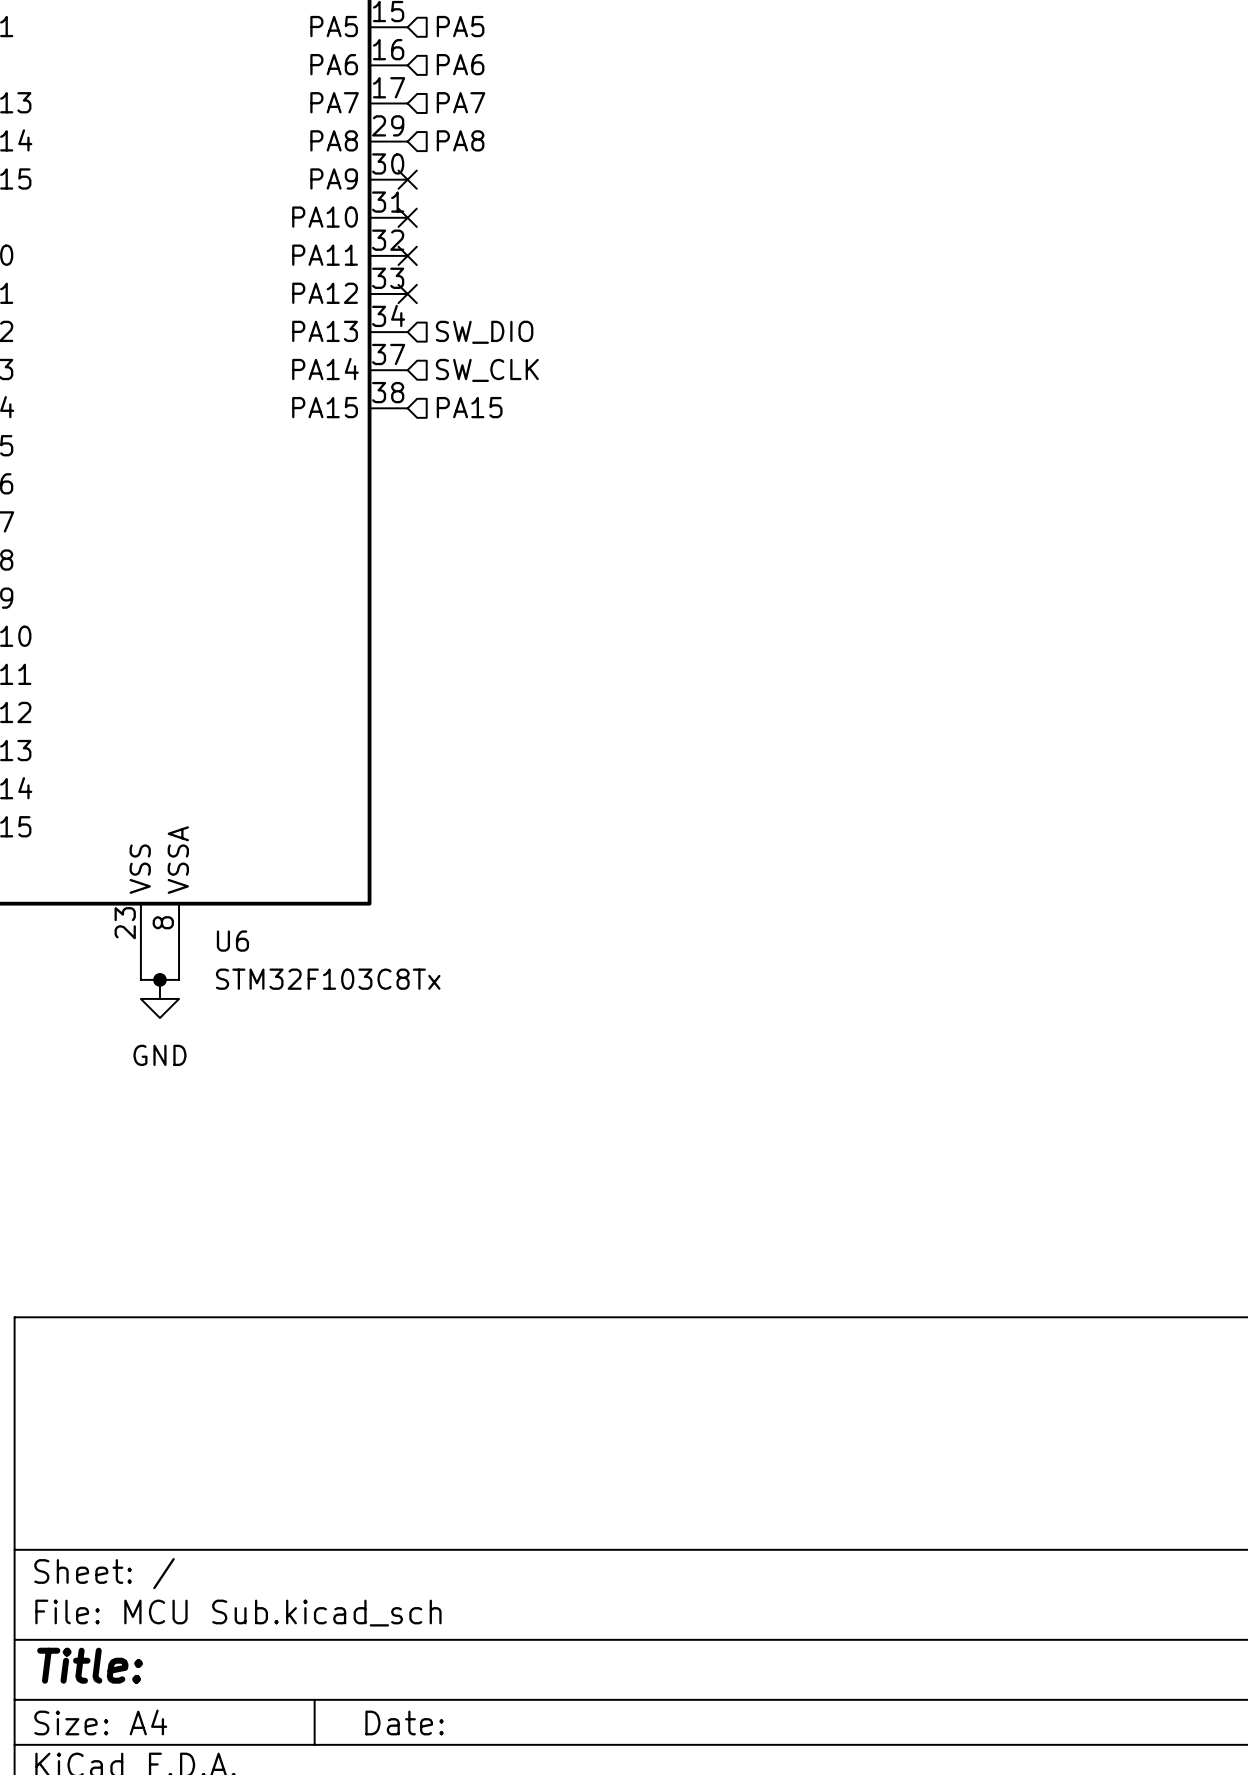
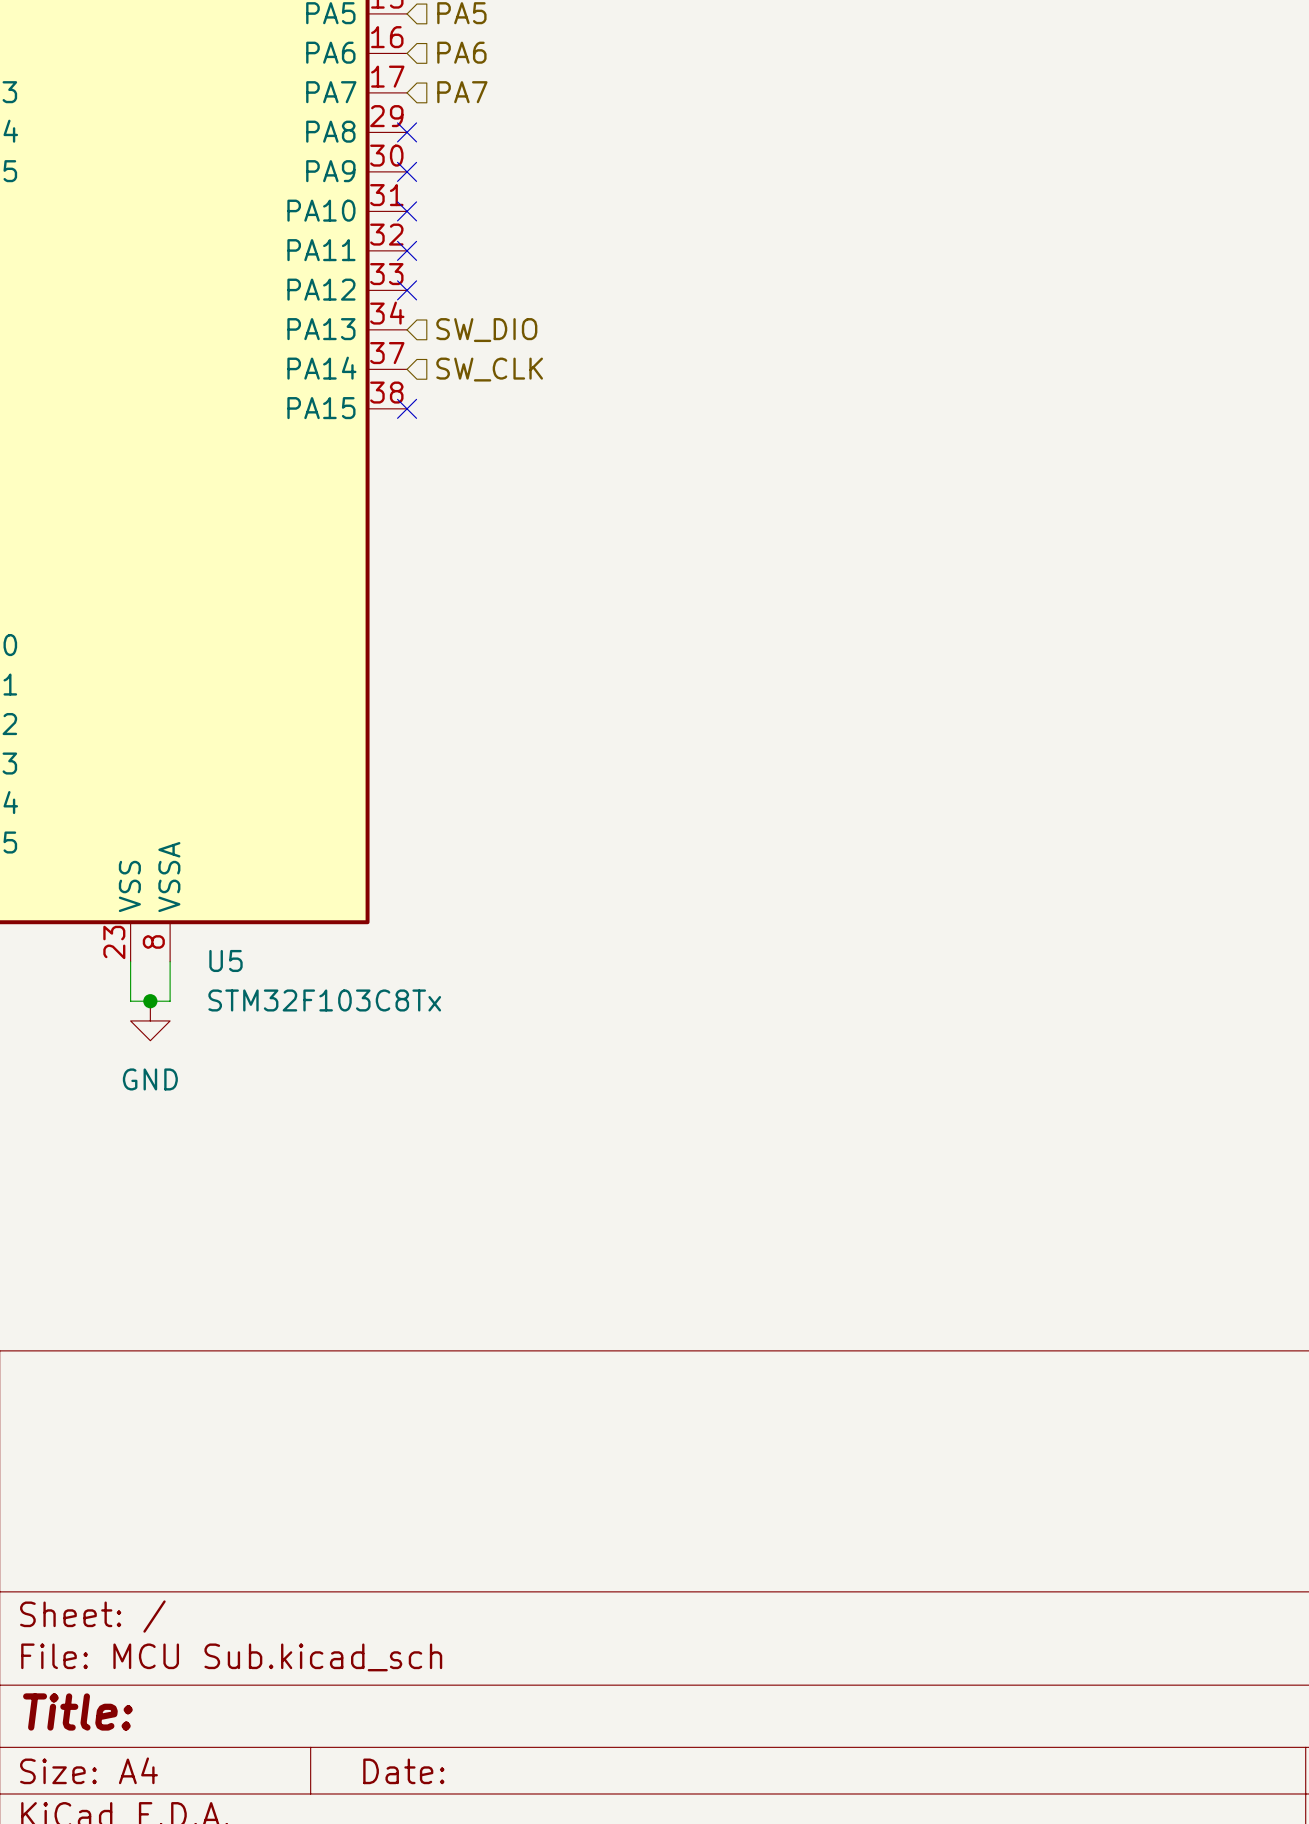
hierarchical label: PA8 (460, 140) -> none
no-connect mark: none -> (407, 132)
hierarchical label: PA15 (469, 407) -> none
no-connect mark: none -> (407, 408)
U6 name: U6 (232, 941) -> U5 (225, 960)

